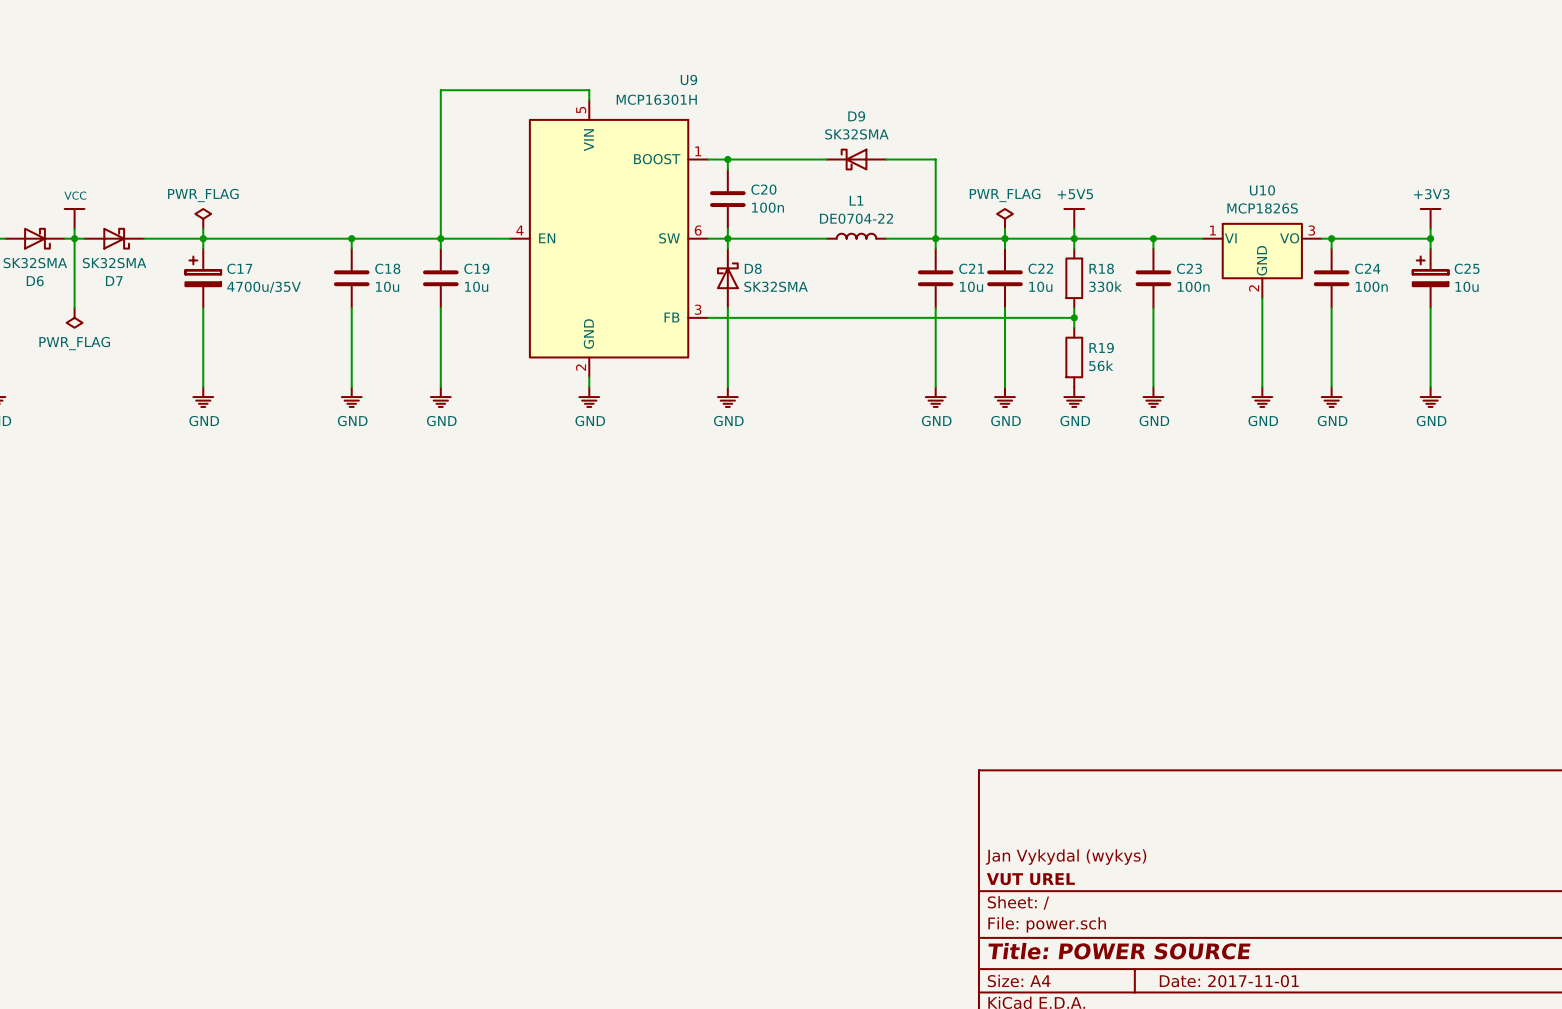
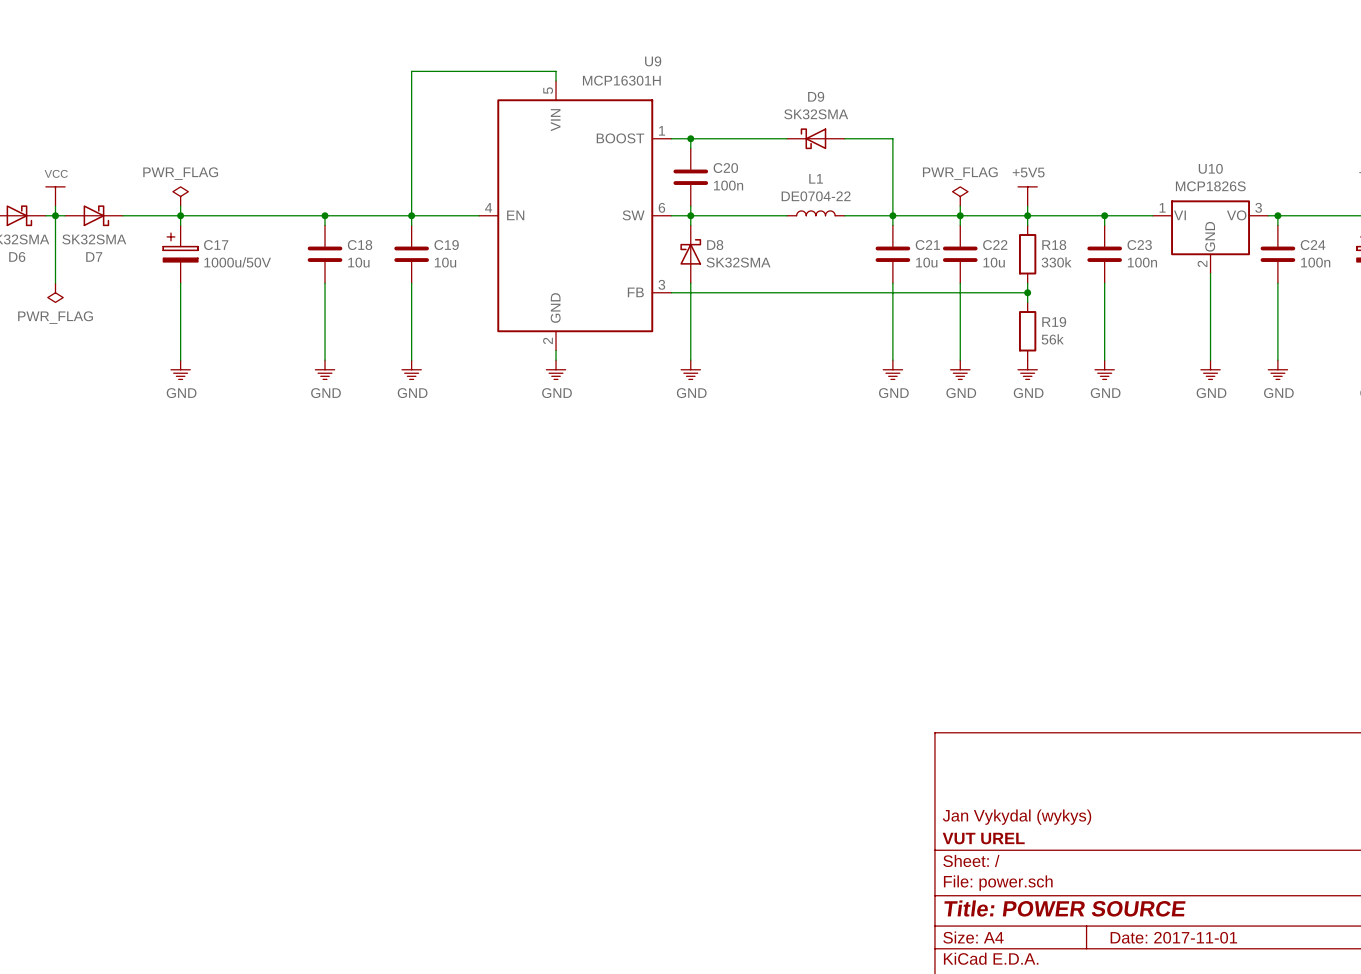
C17 value: 4700u/35V (264, 287) -> 1000u/50V (237, 262)

